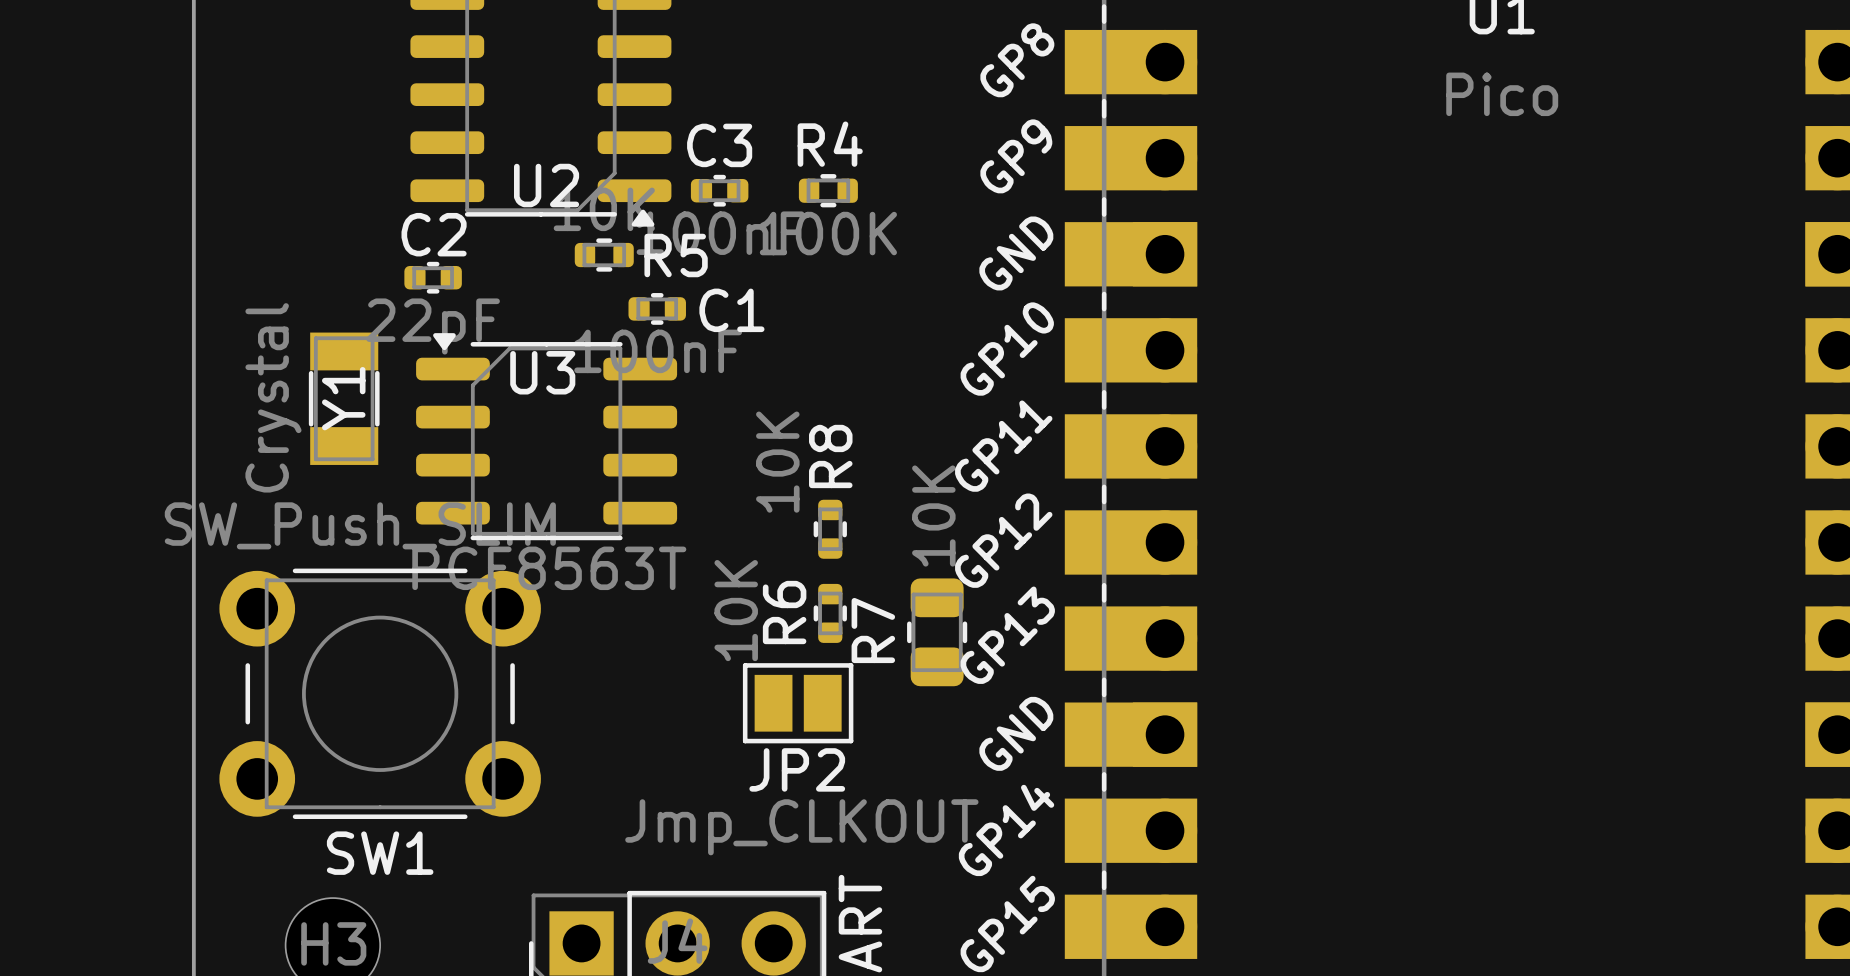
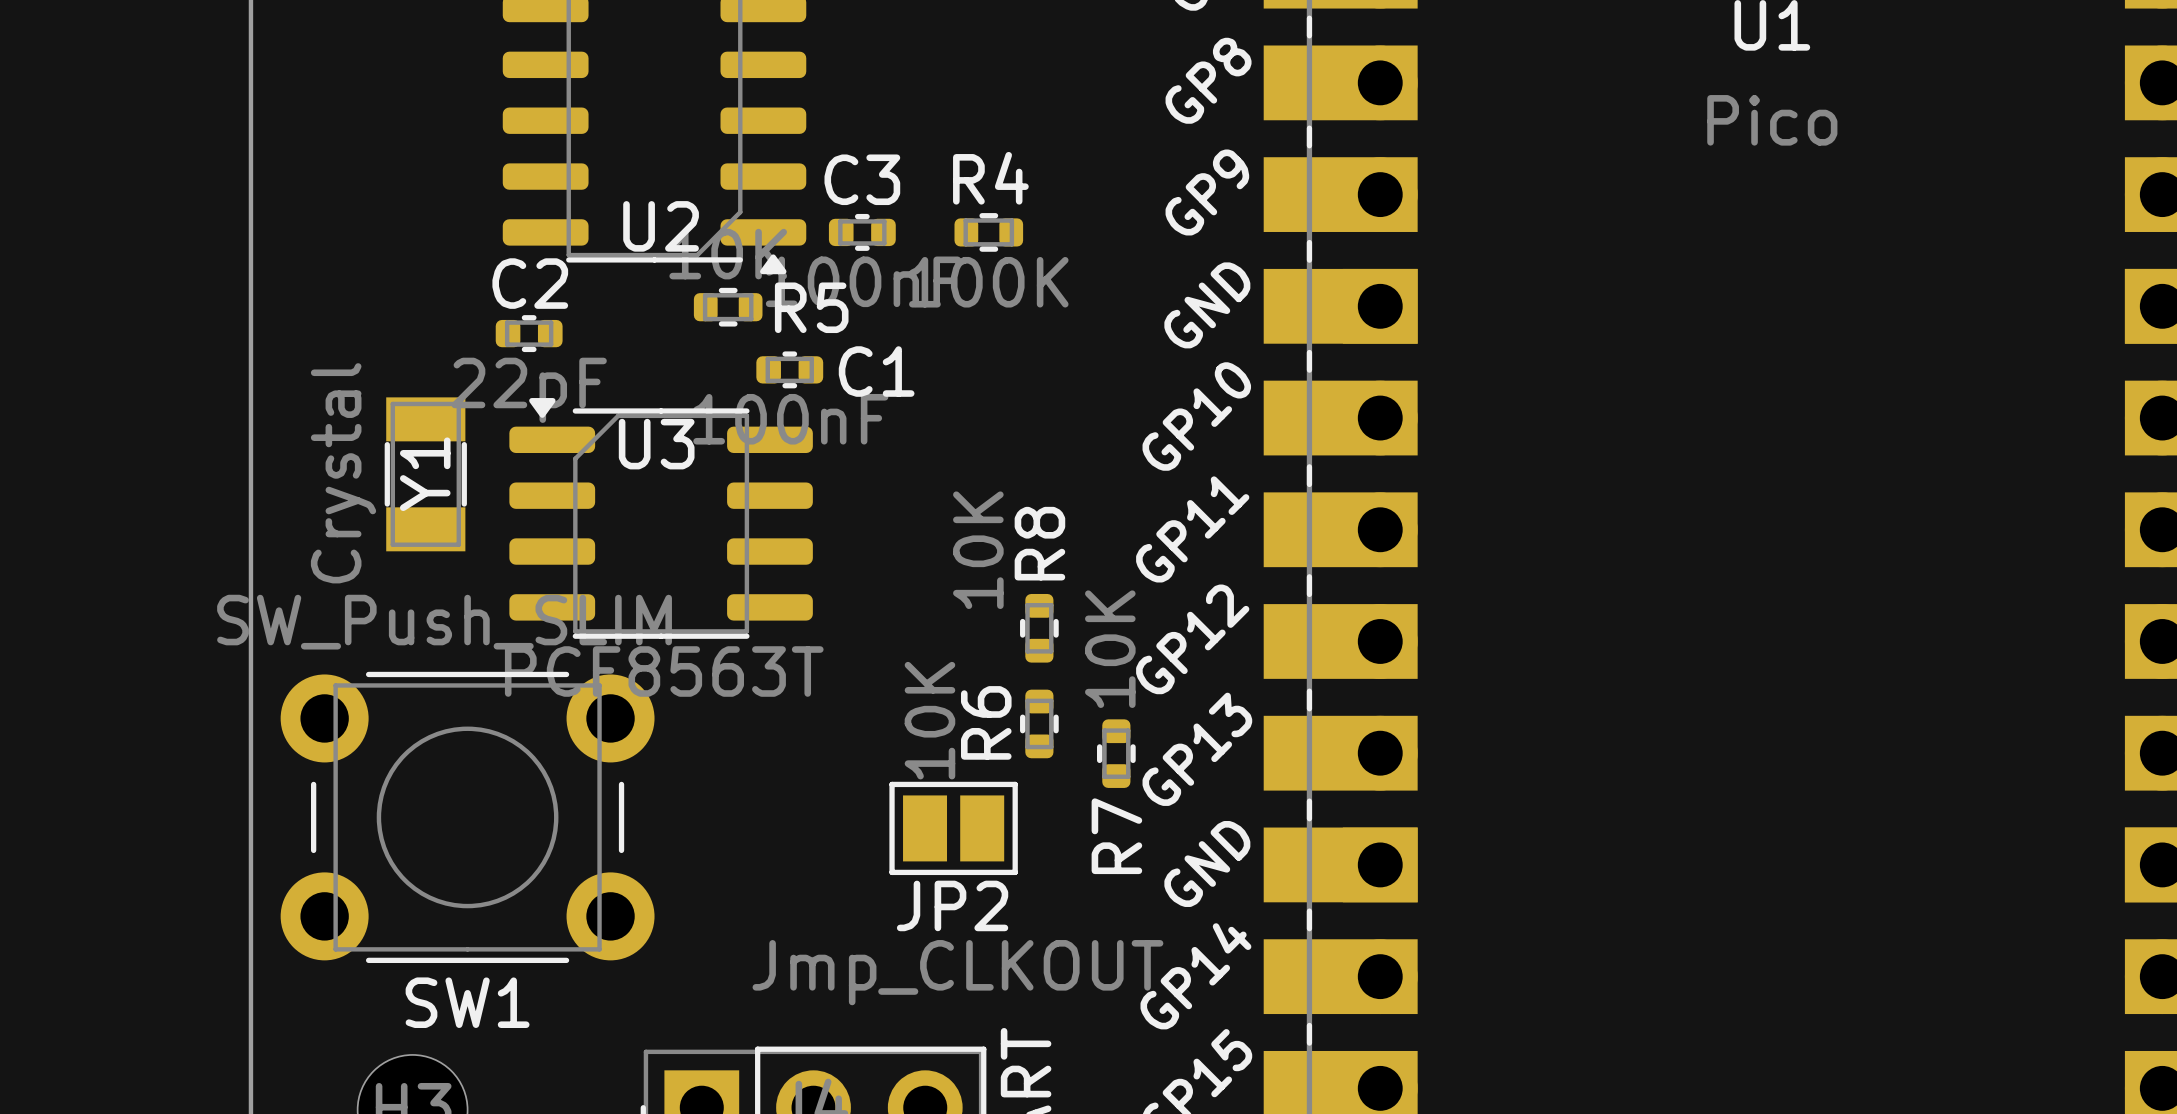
R7 value position: 10K (933, 516) -> 10K (1110, 649)
R8 position: (830, 529) -> (1039, 628)
R7 footprint: [907, 578, 968, 687] -> [1097, 719, 1136, 788]
R6 position: (830, 613) -> (1039, 723)
R7 name position: R7 (873, 630) -> R7 (1116, 836)

